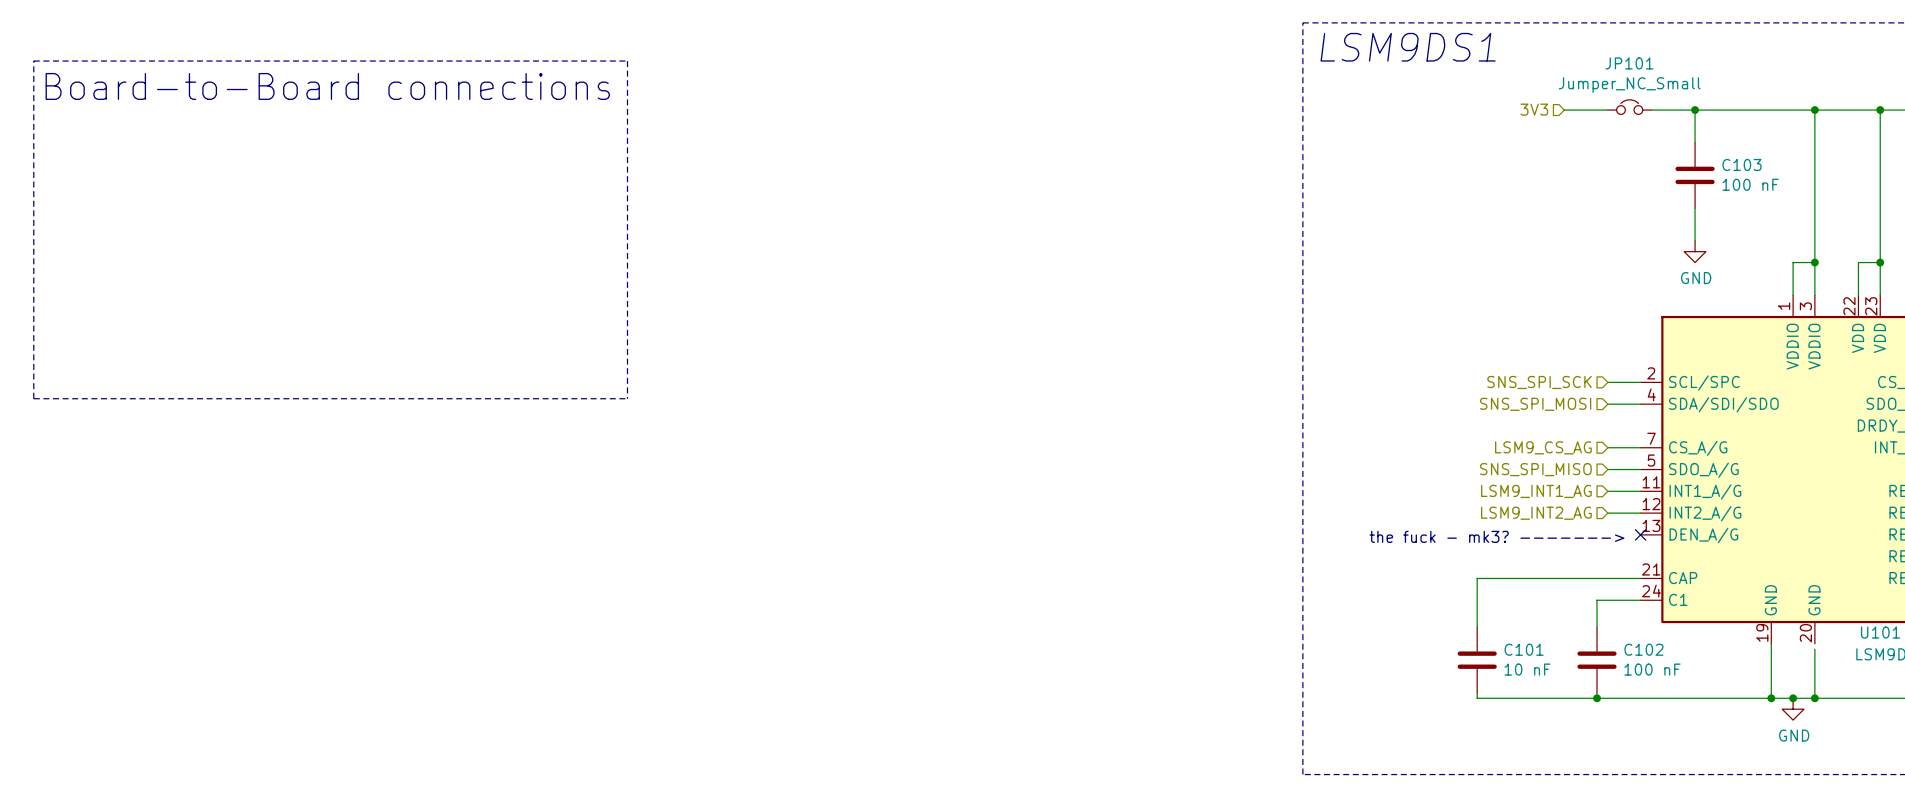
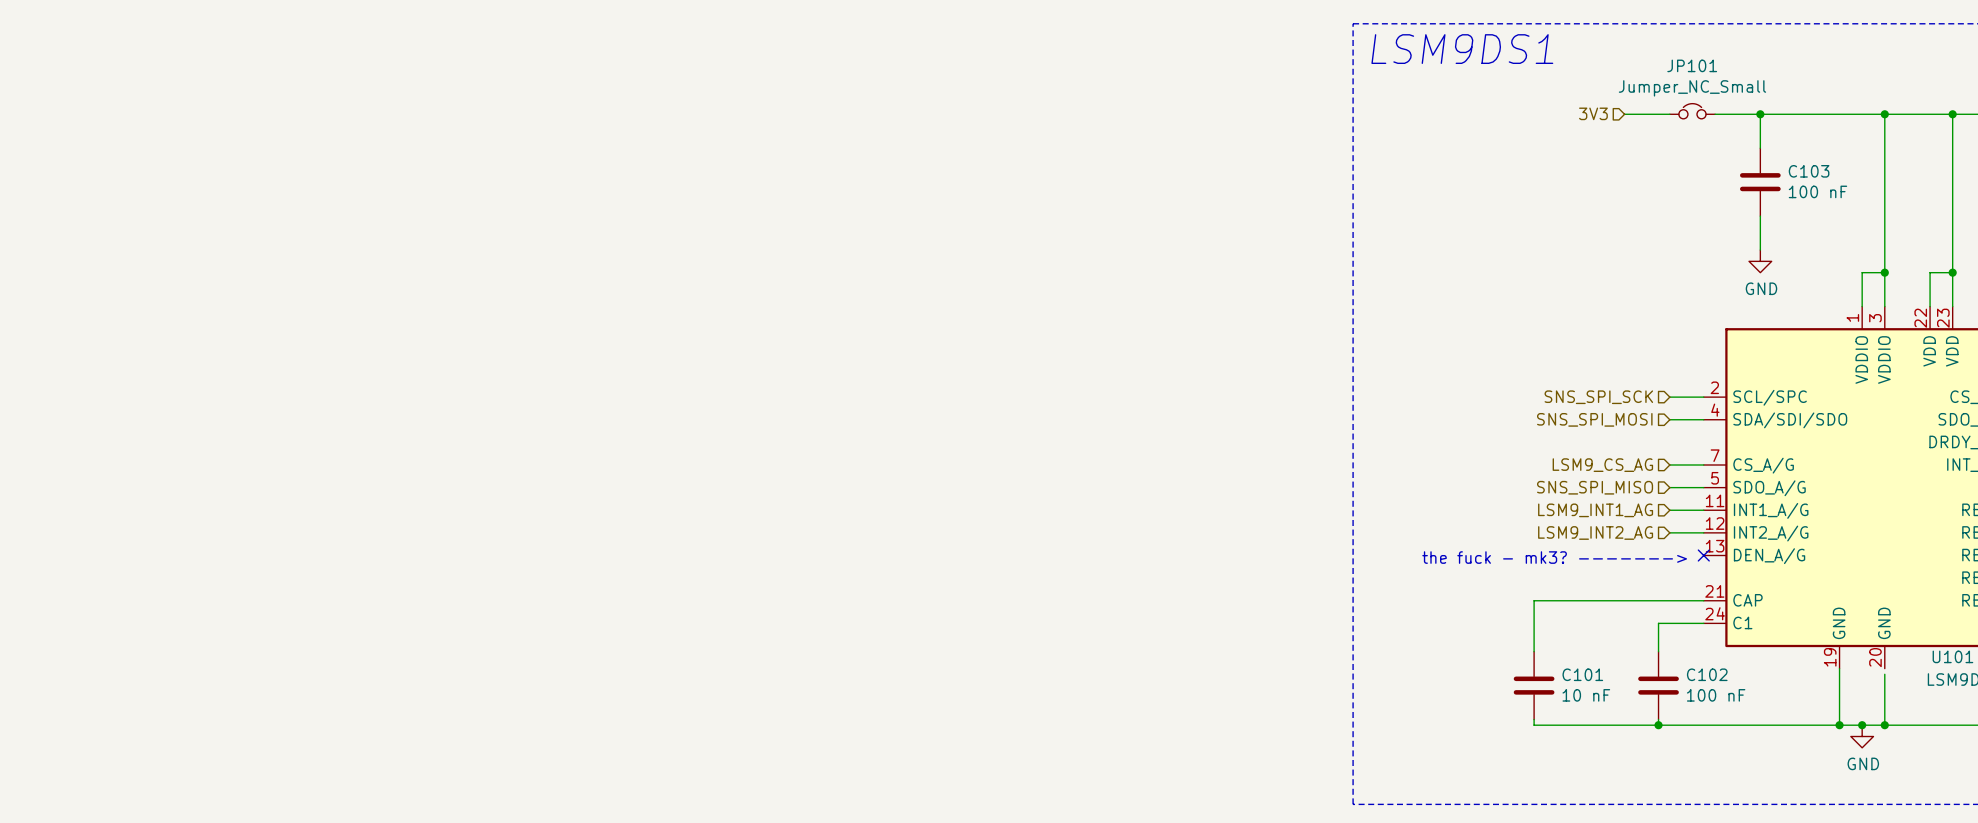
line: (33, 61) (33, 398) (627, 398) (627, 61) (33, 61) -> none
text: Board-to-Board connections (327, 86) -> none

